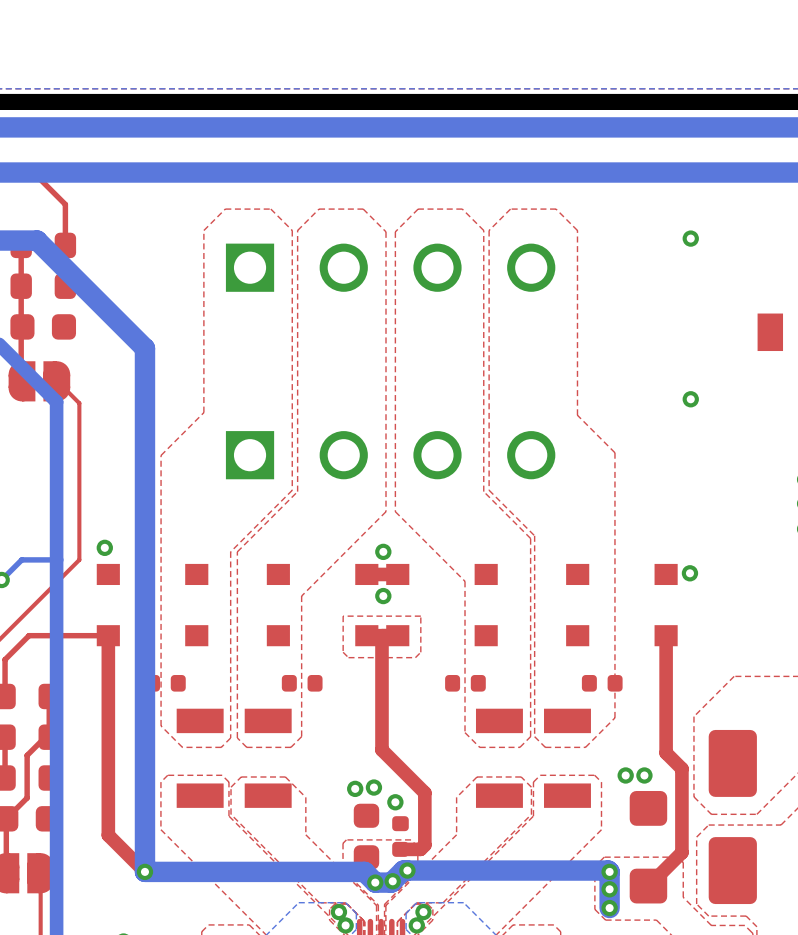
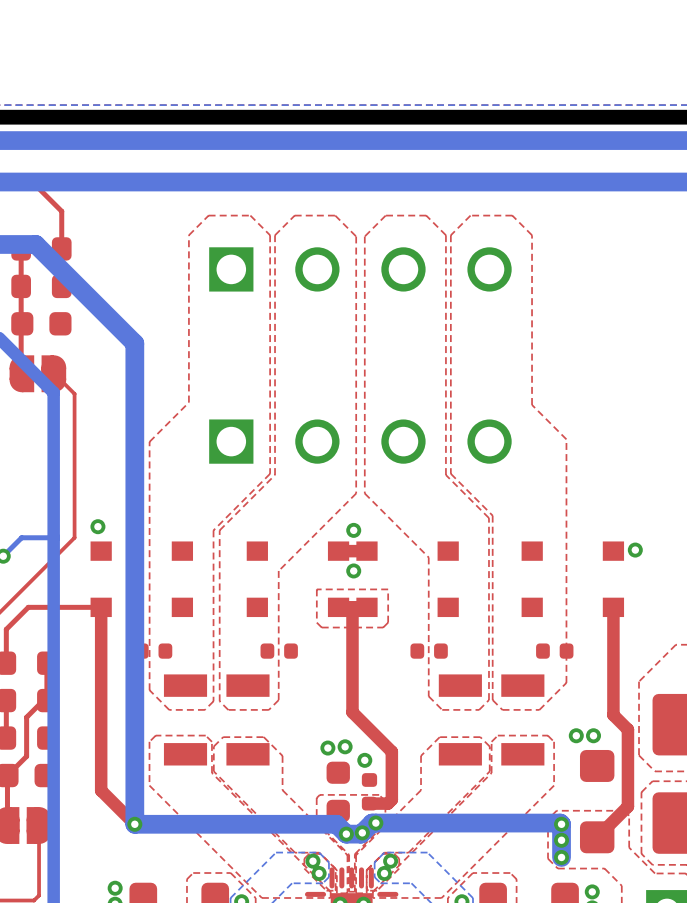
via: (690, 238) -> none
via: (690, 399) -> none

